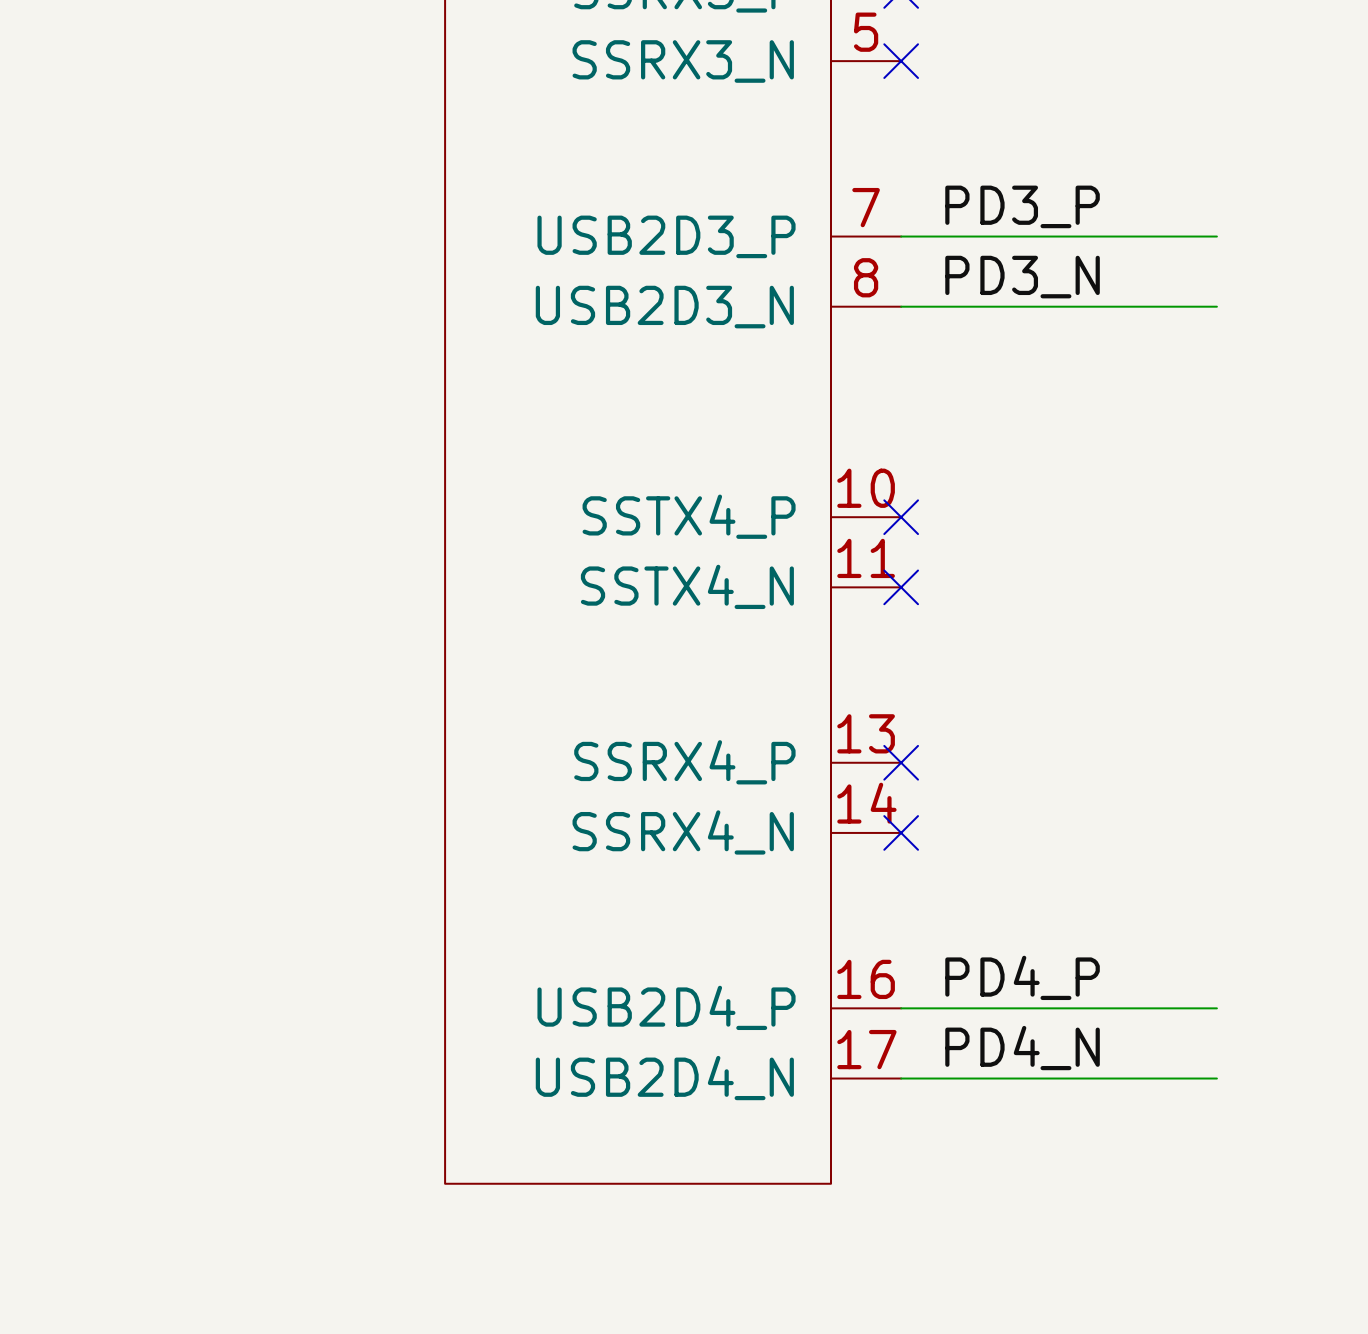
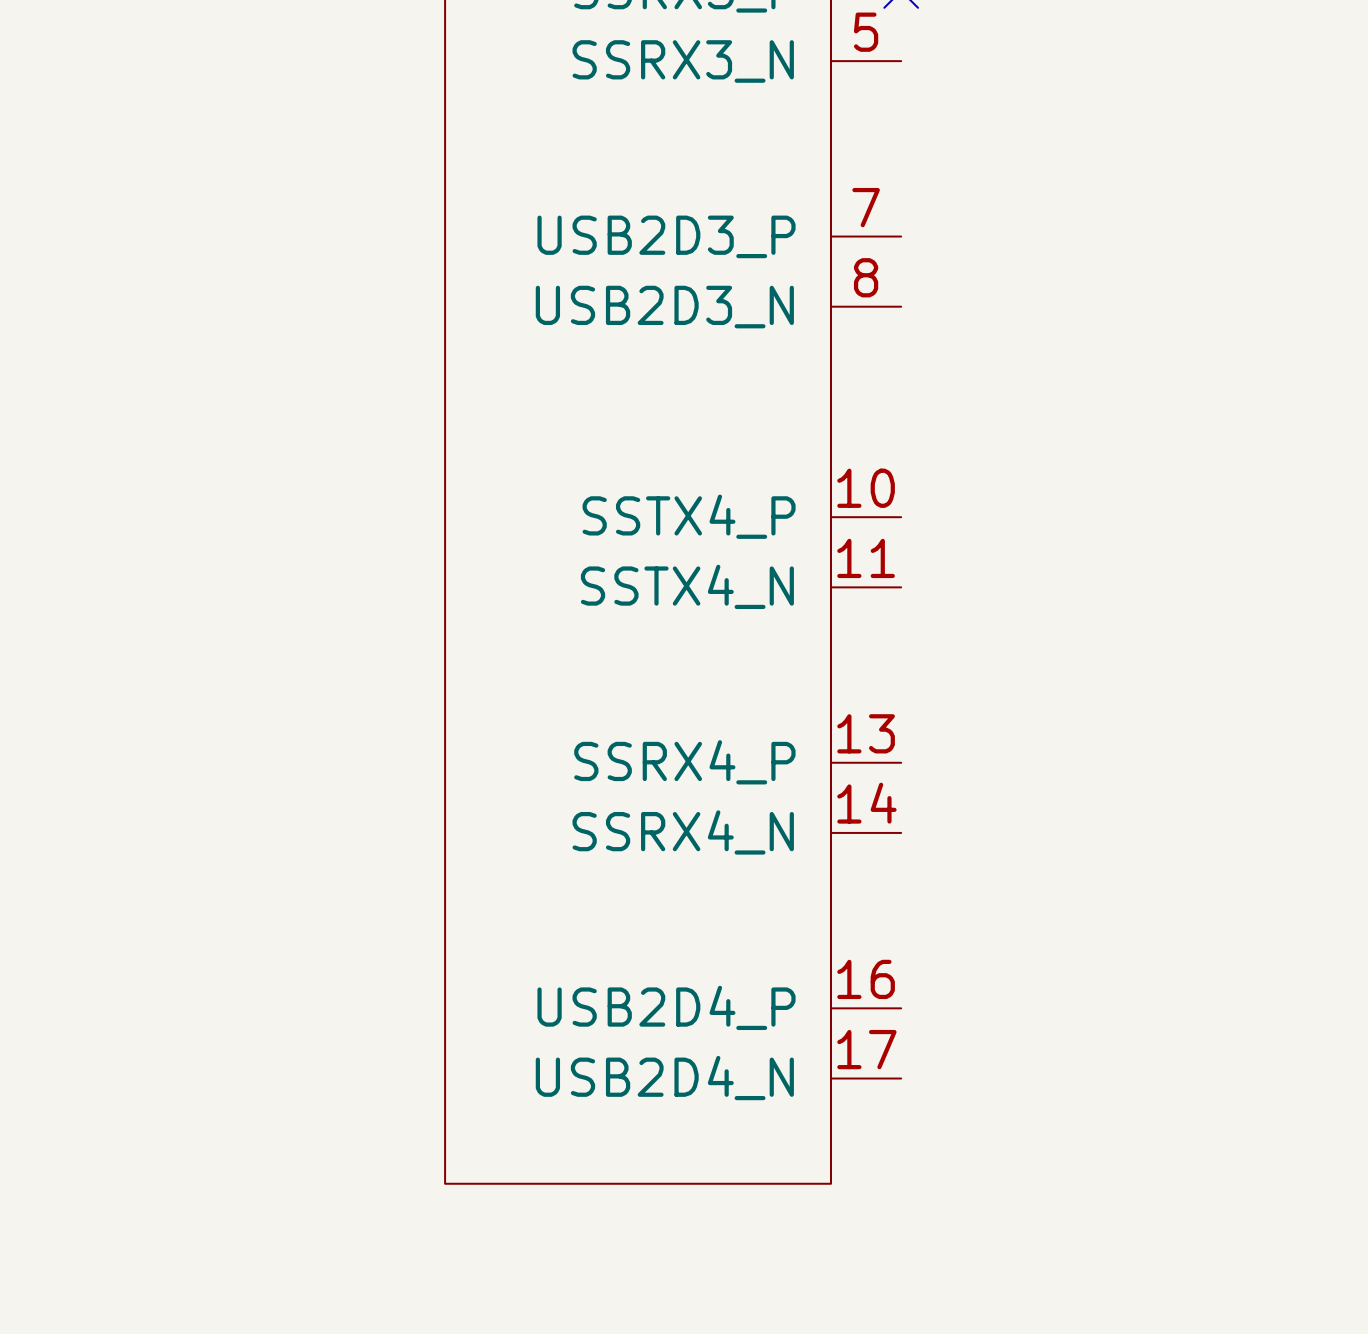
no-connect mark: (901, 61) -> none
label: PD3_P (1022, 206) -> none
wire: (901, 236) (1216, 236) -> none
label: PD3_N (1022, 277) -> none
wire: (901, 306) (1216, 306) -> none
no-connect mark: (901, 517) -> none
no-connect mark: (901, 587) -> none
no-connect mark: (901, 762) -> none
no-connect mark: (901, 832) -> none
label: PD4_P (1022, 977) -> none
wire: (901, 1008) (1216, 1008) -> none
label: PD4_N (1022, 1048) -> none
wire: (901, 1078) (1216, 1078) -> none

